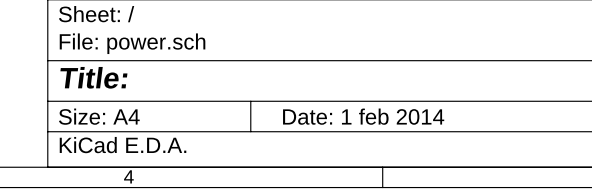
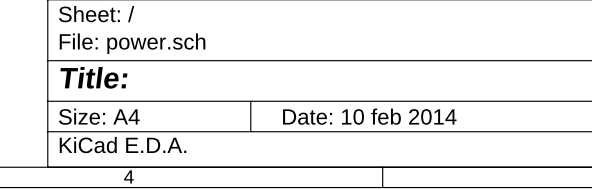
title block: Date: 1 feb 2014 (363, 116) -> Date: 10 feb 2014 (369, 116)

